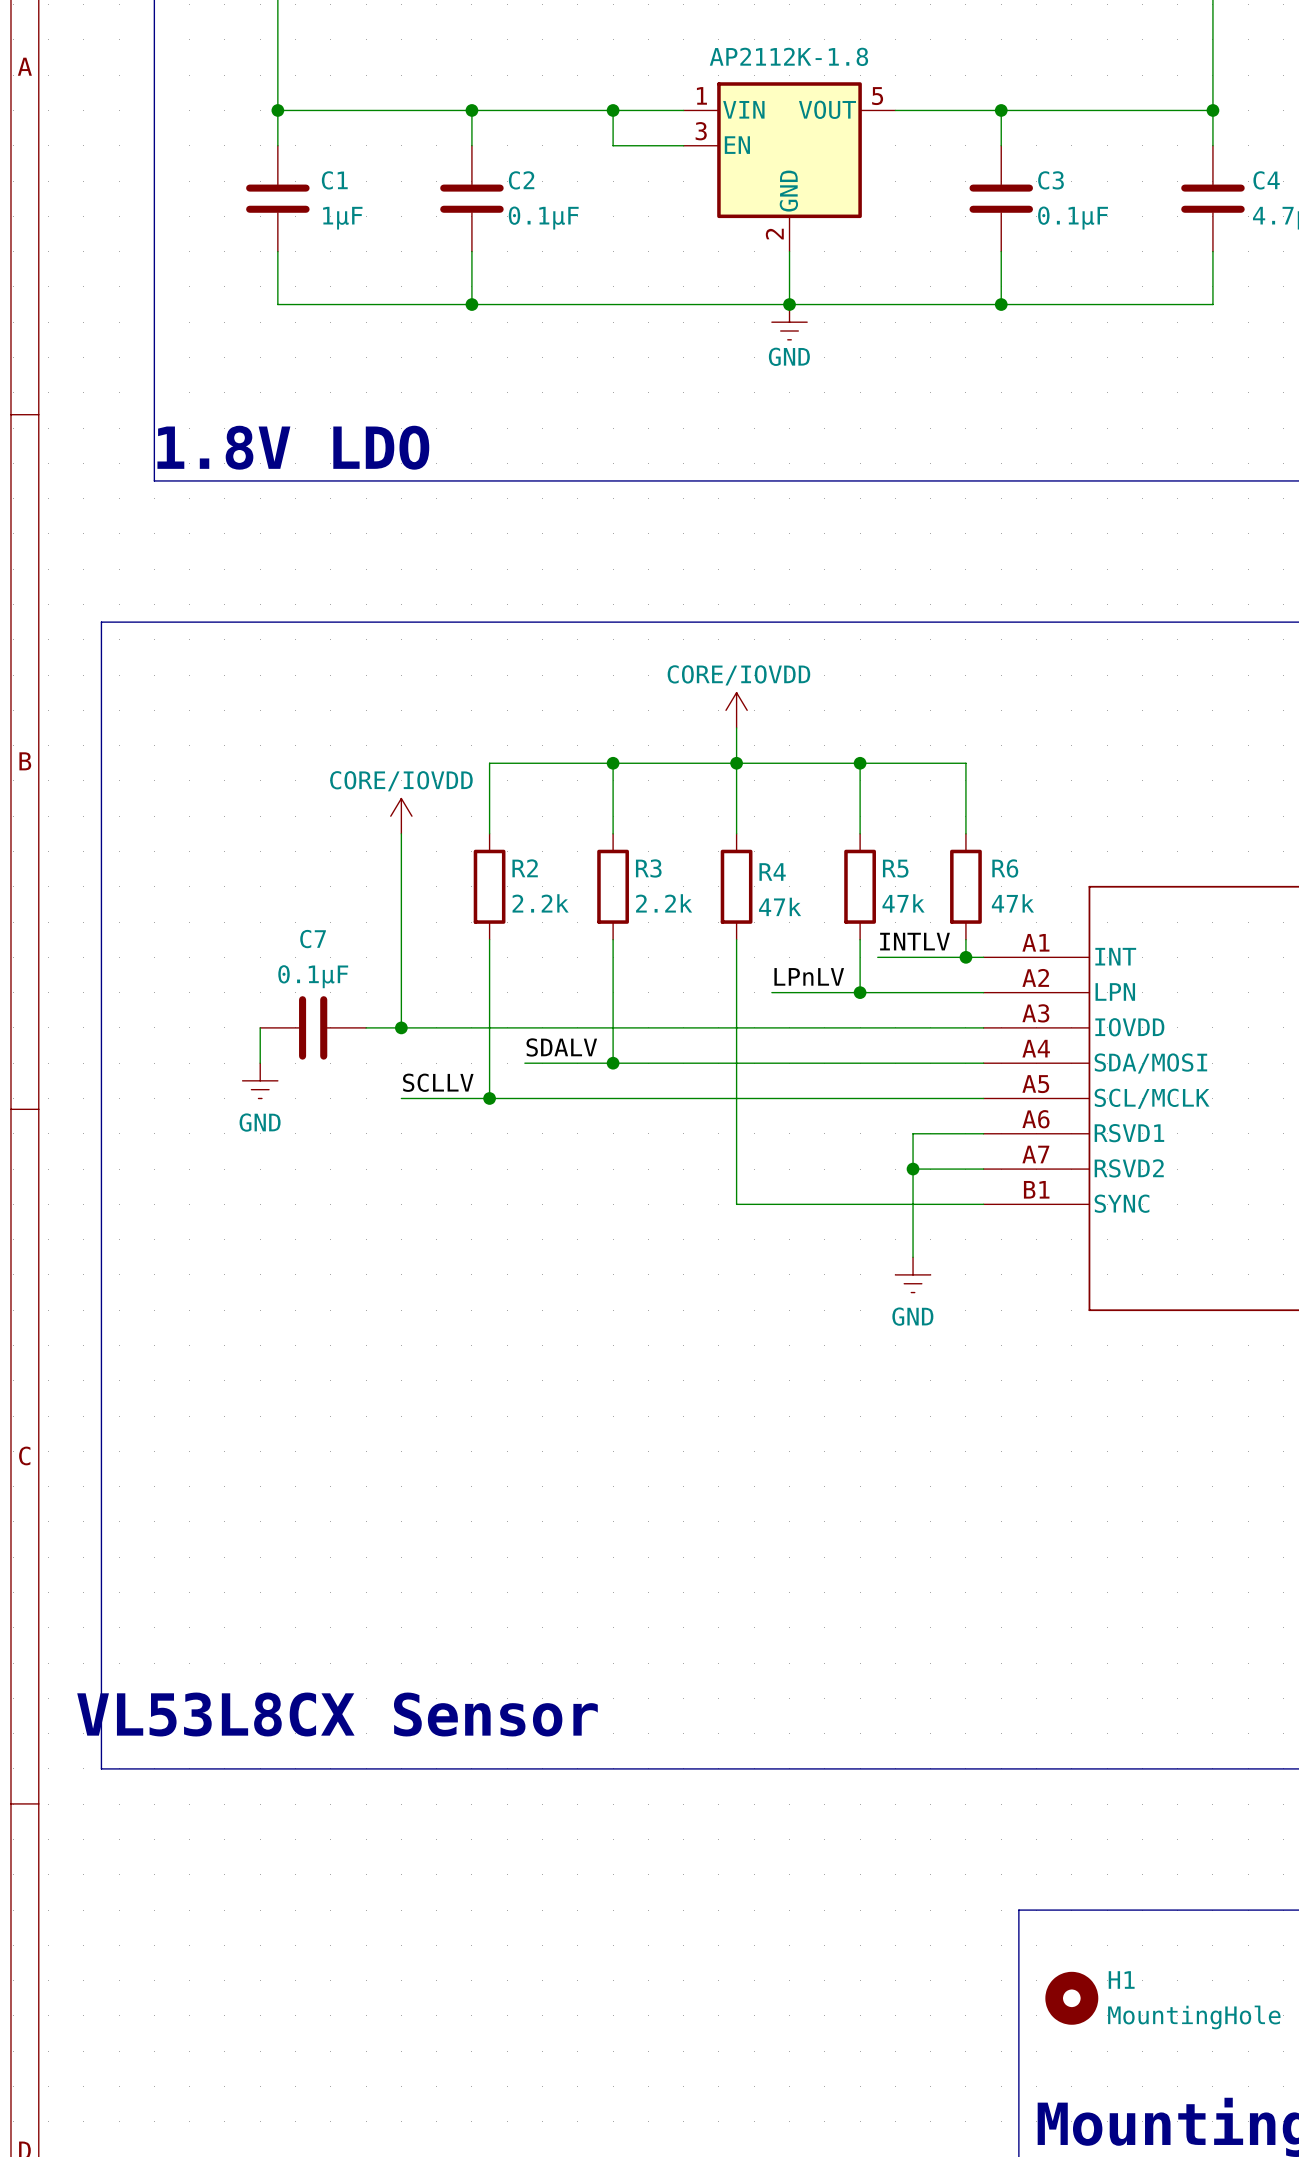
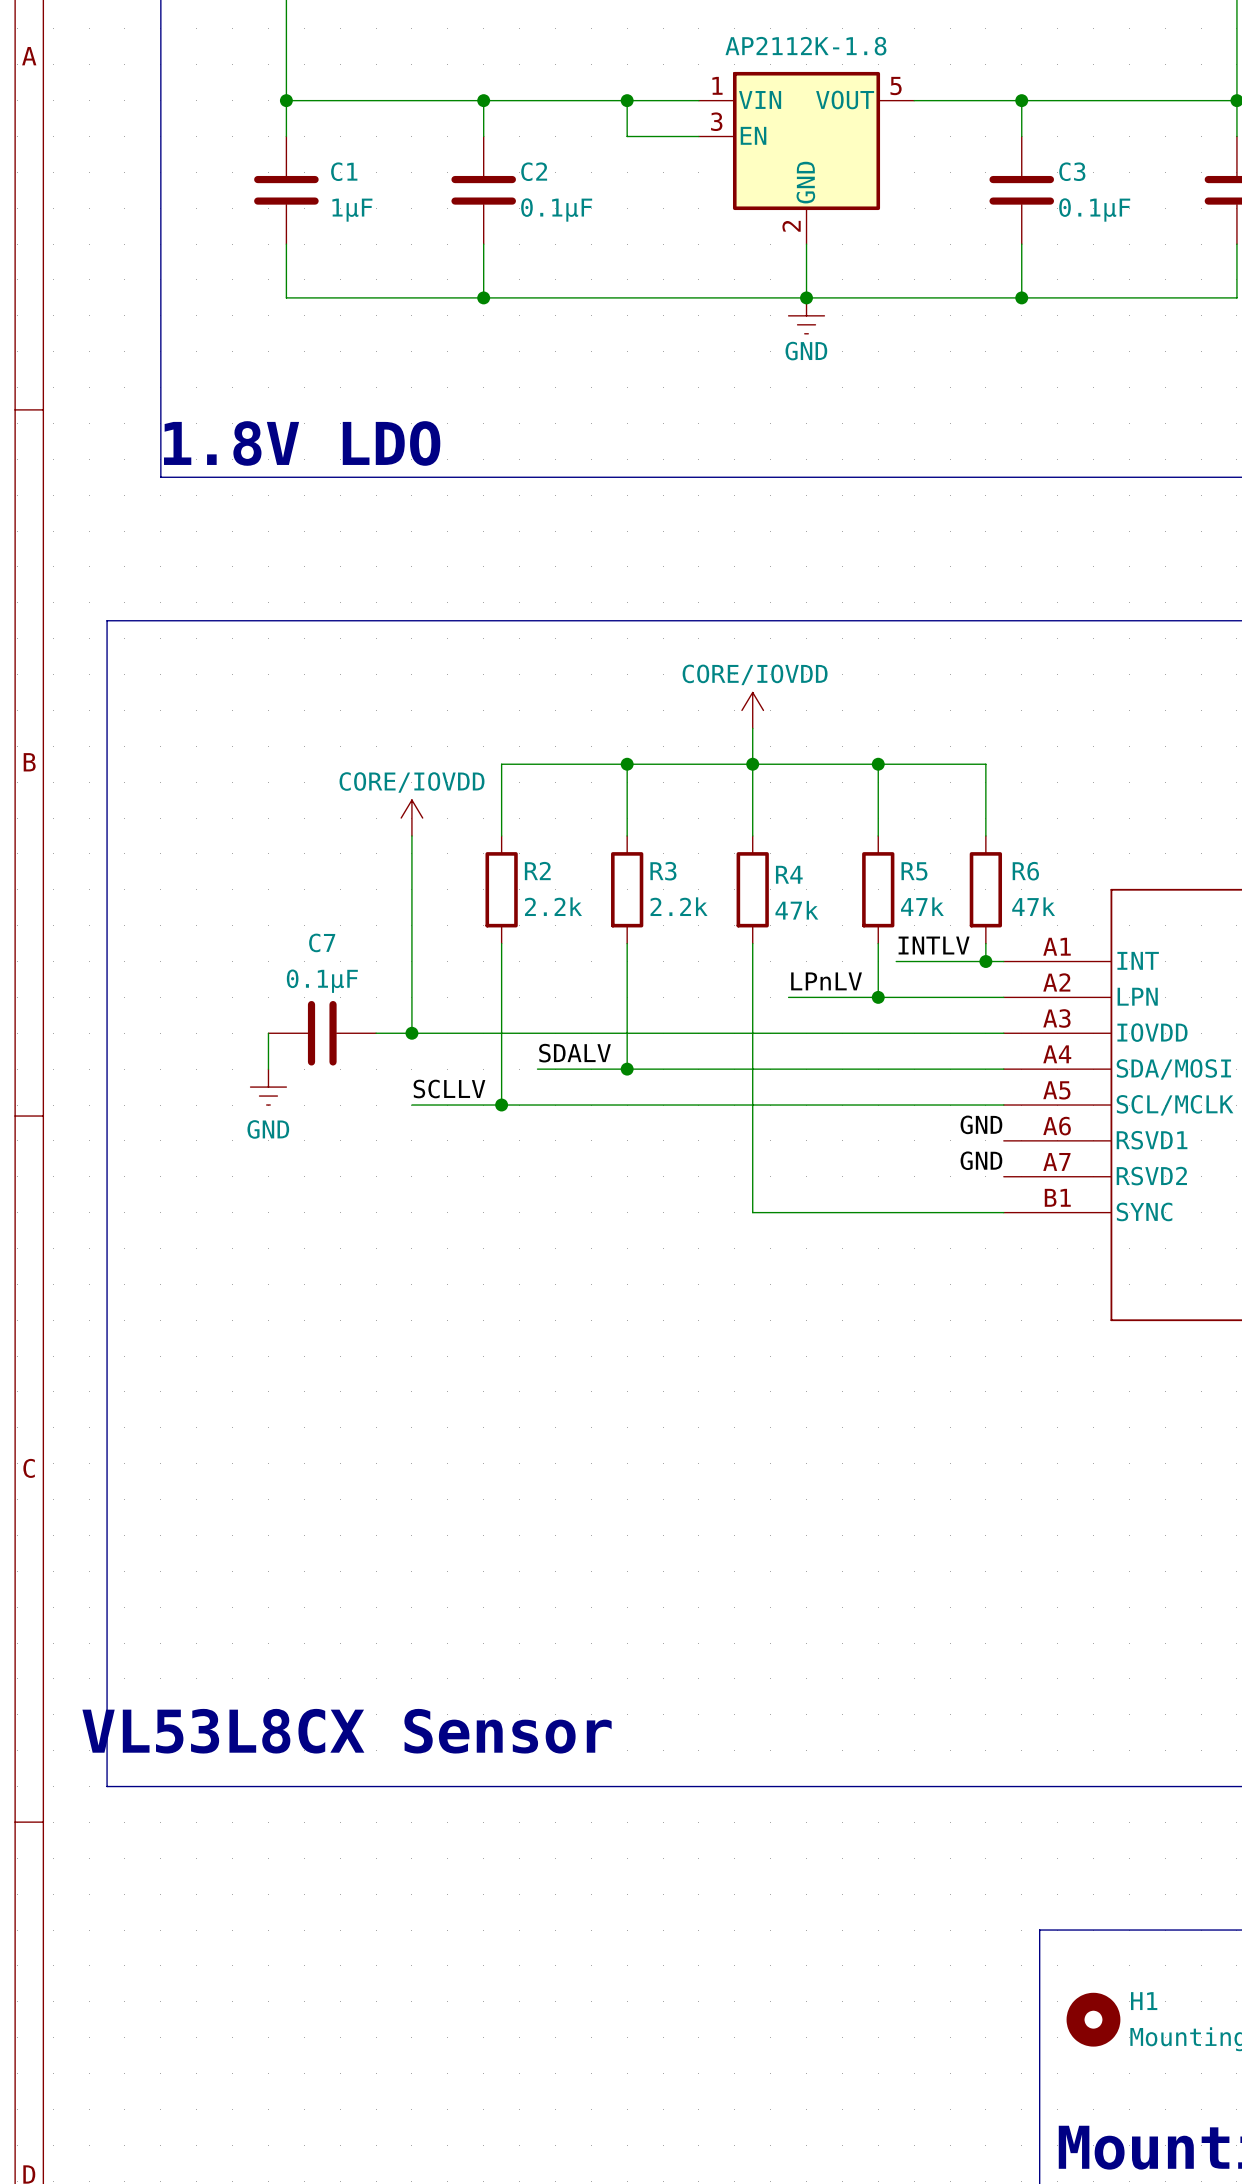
label: none -> GND (981, 1124)
wire: (983, 1133) (913, 1133) (913, 1257) -> none
label: none -> GND (981, 1160)
wire: (913, 1169) (983, 1169) -> none
junction: (913, 1169) -> none
power symbol: GND (913, 1274) -> none

